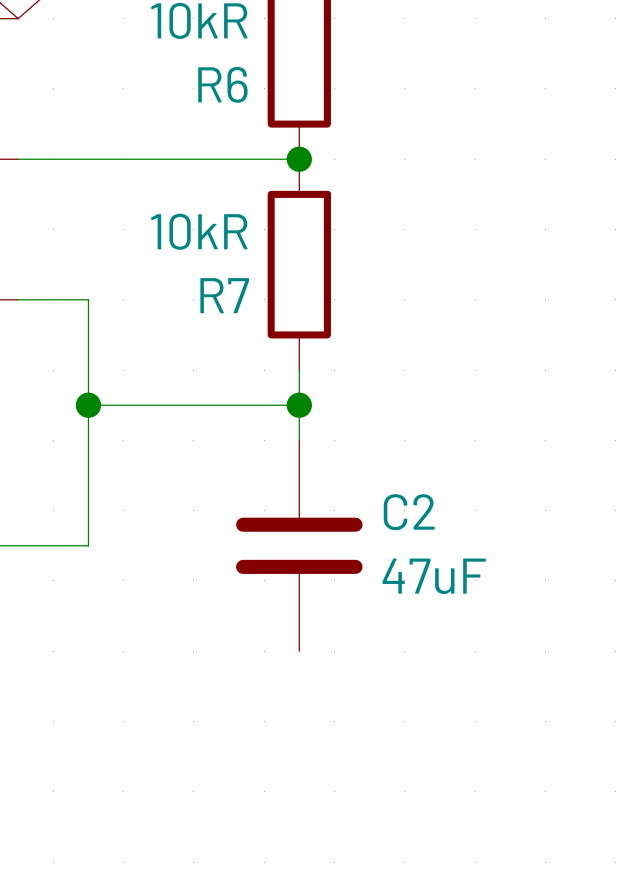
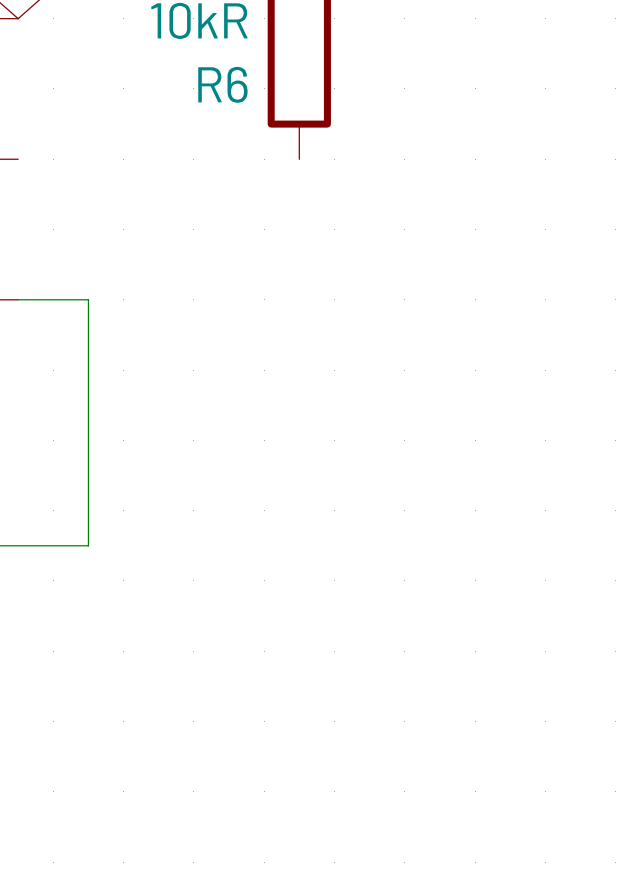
wire: (18, 159) (299, 159) -> none
junction: (299, 159) -> none
R7: 10kR (299, 264) -> none
wire: (299, 370) (299, 440) -> none
wire: (88, 405) (299, 405) -> none
junction: (88, 405) -> none
junction: (299, 405) -> none
C2: 47uF (299, 545) -> none

